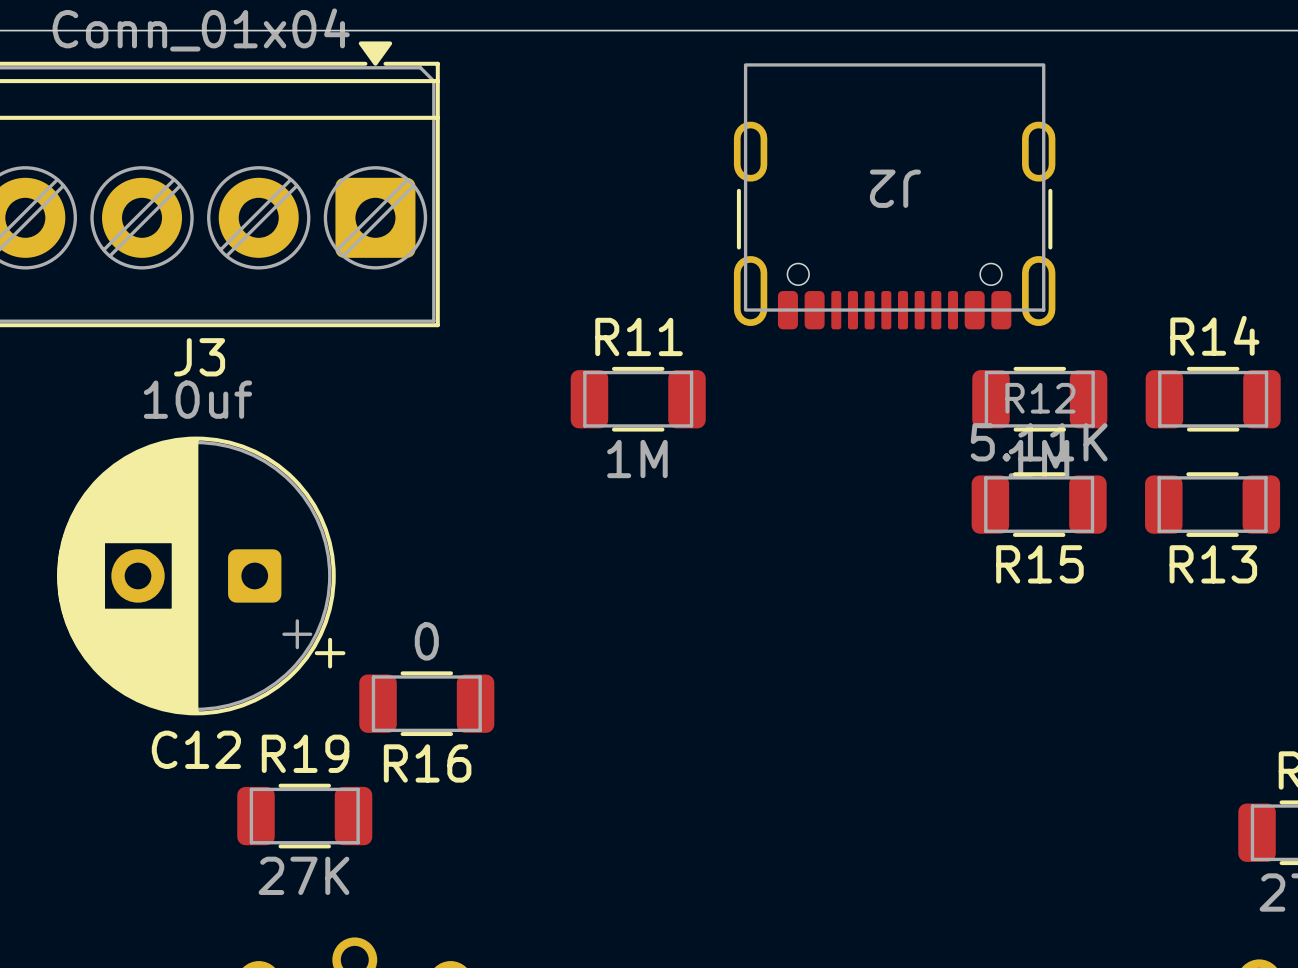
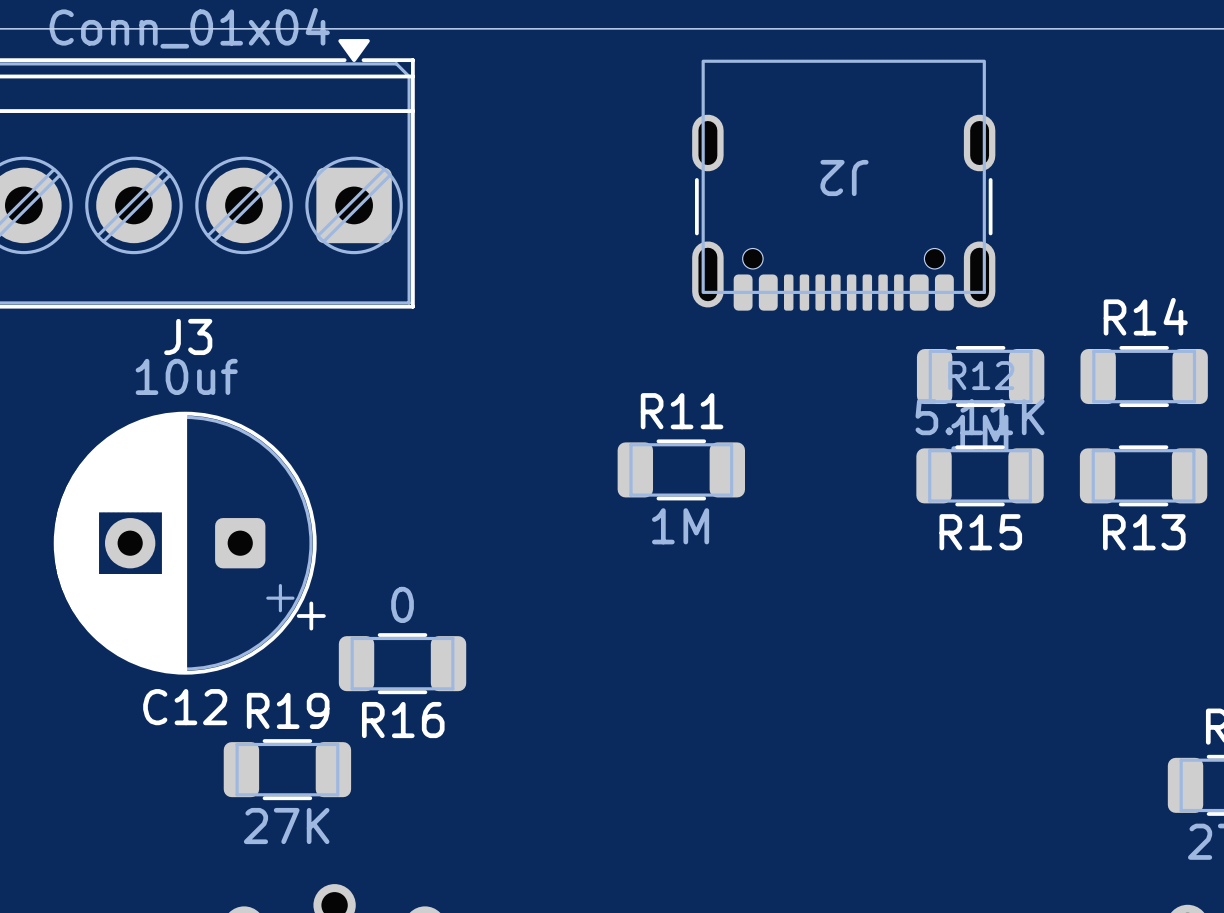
R11 position: (638, 399) -> (681, 469)

